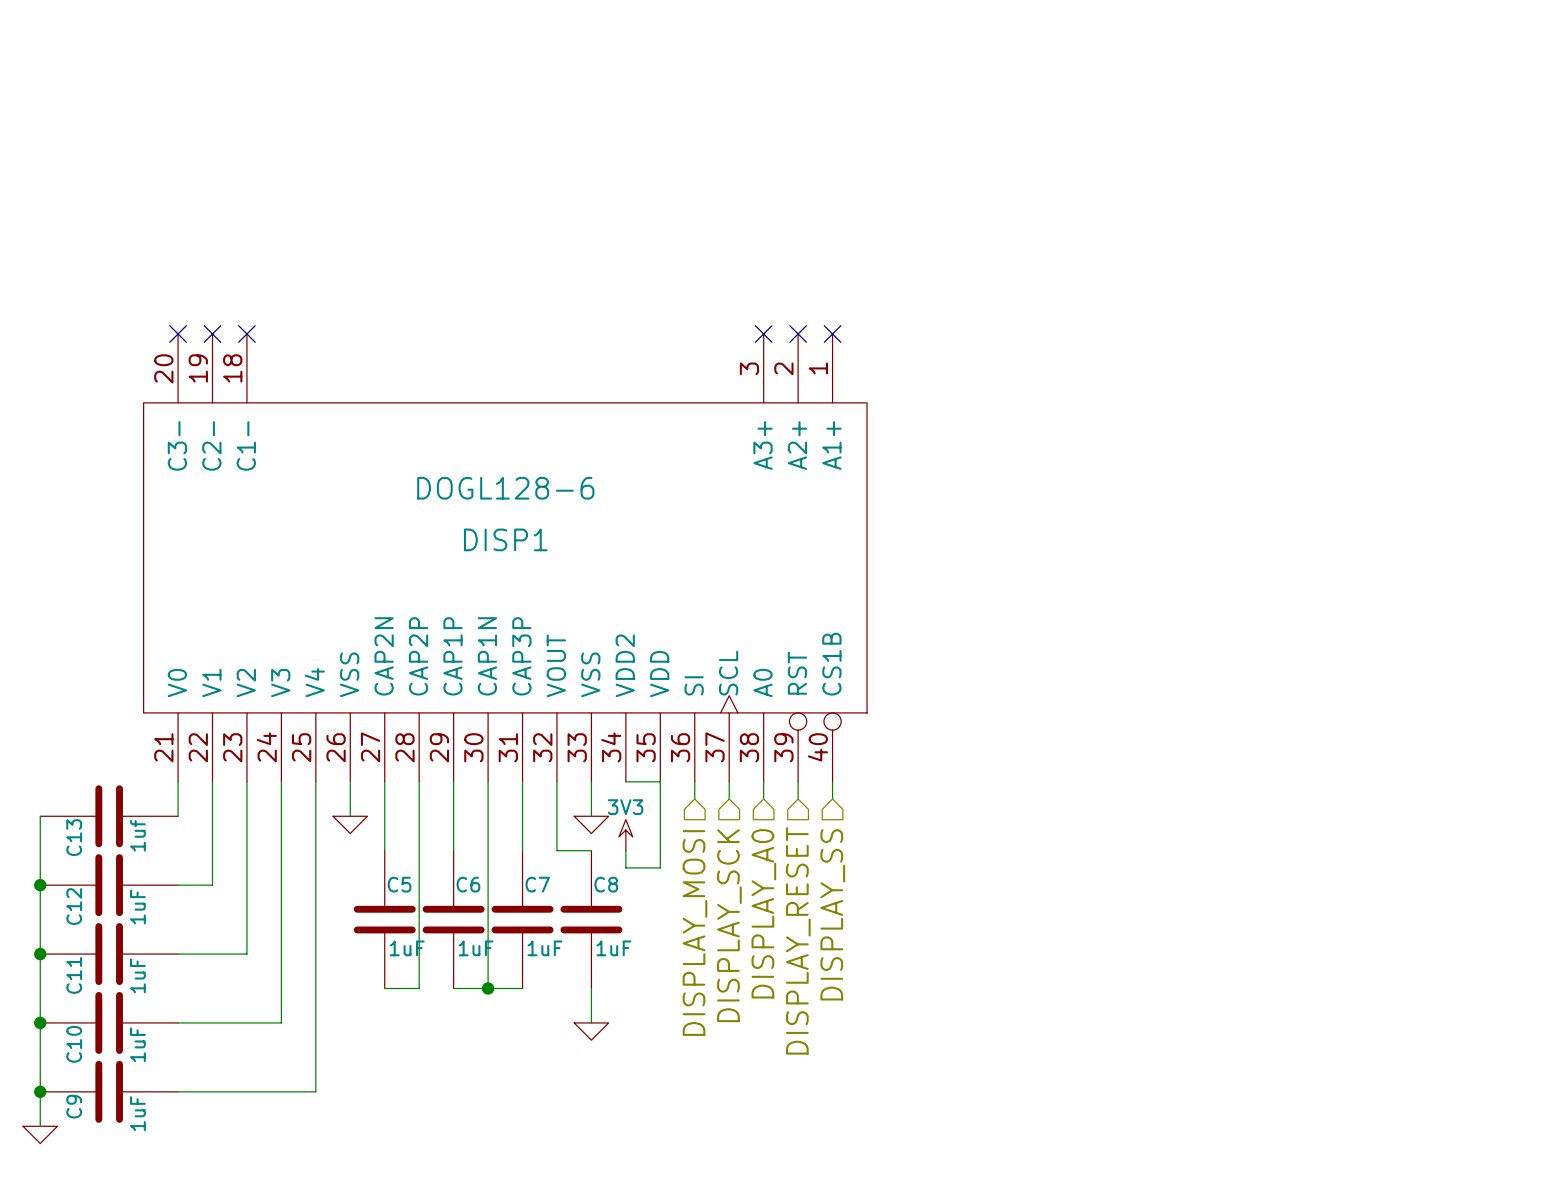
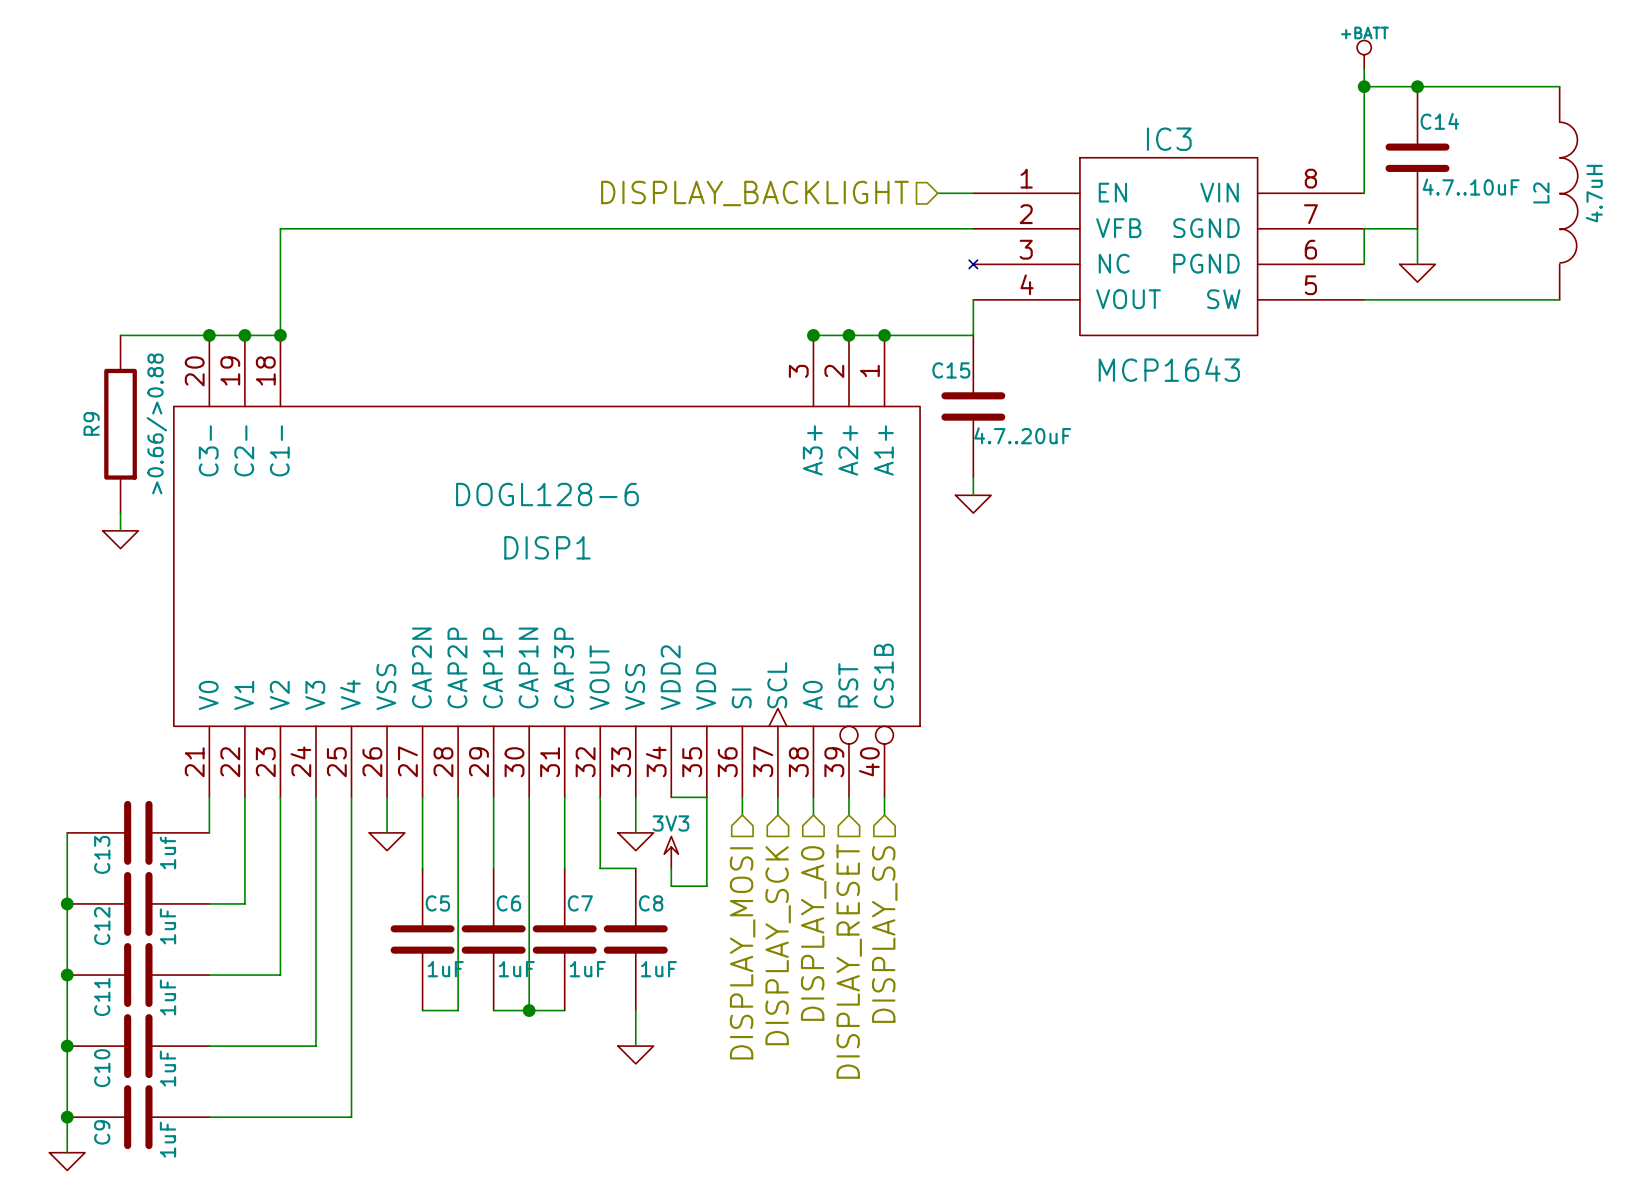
power symbol: none -> +BATT (1364, 54)
wire: none -> (1364, 68) (1364, 193)
wire: none -> (1364, 86) (1559, 86)
junction: none -> (1364, 86)
junction: none -> (1417, 86)
C14: none -> 4.7..10uF (1417, 157)
hierarchical label: none -> DISPLAY_BACKLIGHT (754, 193)
wire: none -> (937, 193) (973, 193)
L2: none -> 4.7uH (1568, 193)
wire: none -> (973, 228) (280, 228) (280, 335) (120, 335)
IC3: none -> MCP1643 (1166, 246)
wire: none -> (1364, 264) (1364, 228) (1417, 228) (1417, 264)
power symbol: none -> (1417, 273)
wire: none -> (973, 299) (973, 335) (813, 335)
wire: none -> (1364, 299) (1559, 299)
no-connect mark: (178, 333) -> none
junction: none -> (209, 335)
no-connect mark: (212, 333) -> none
junction: none -> (244, 335)
no-connect mark: (246, 333) -> none
junction: none -> (280, 335)
no-connect mark: (763, 333) -> none
junction: none -> (813, 335)
no-connect mark: (798, 333) -> none
junction: none -> (848, 335)
no-connect mark: (832, 333) -> none
junction: none -> (884, 335)
C15: none -> 4.7..20uF (973, 406)
R9: none -> >0.66/>0.88 (120, 424)
wire: none -> (973, 477) (973, 495)
power symbol: none -> (973, 504)
wire: none -> (120, 513) (120, 530)
power symbol: none -> (120, 539)

